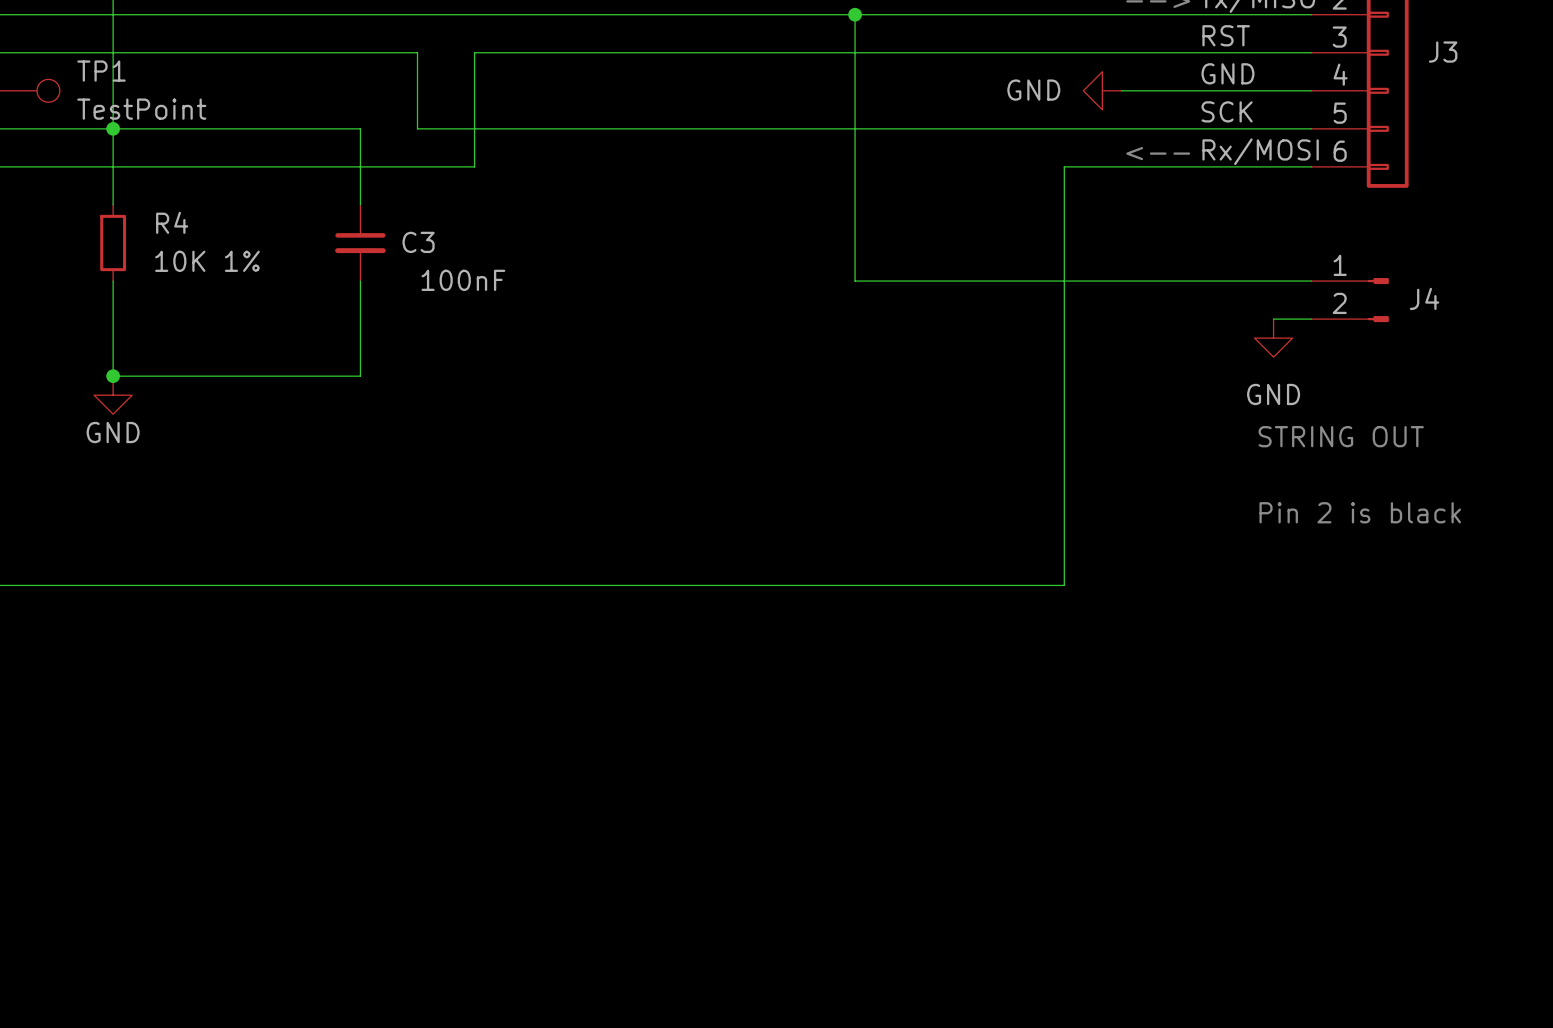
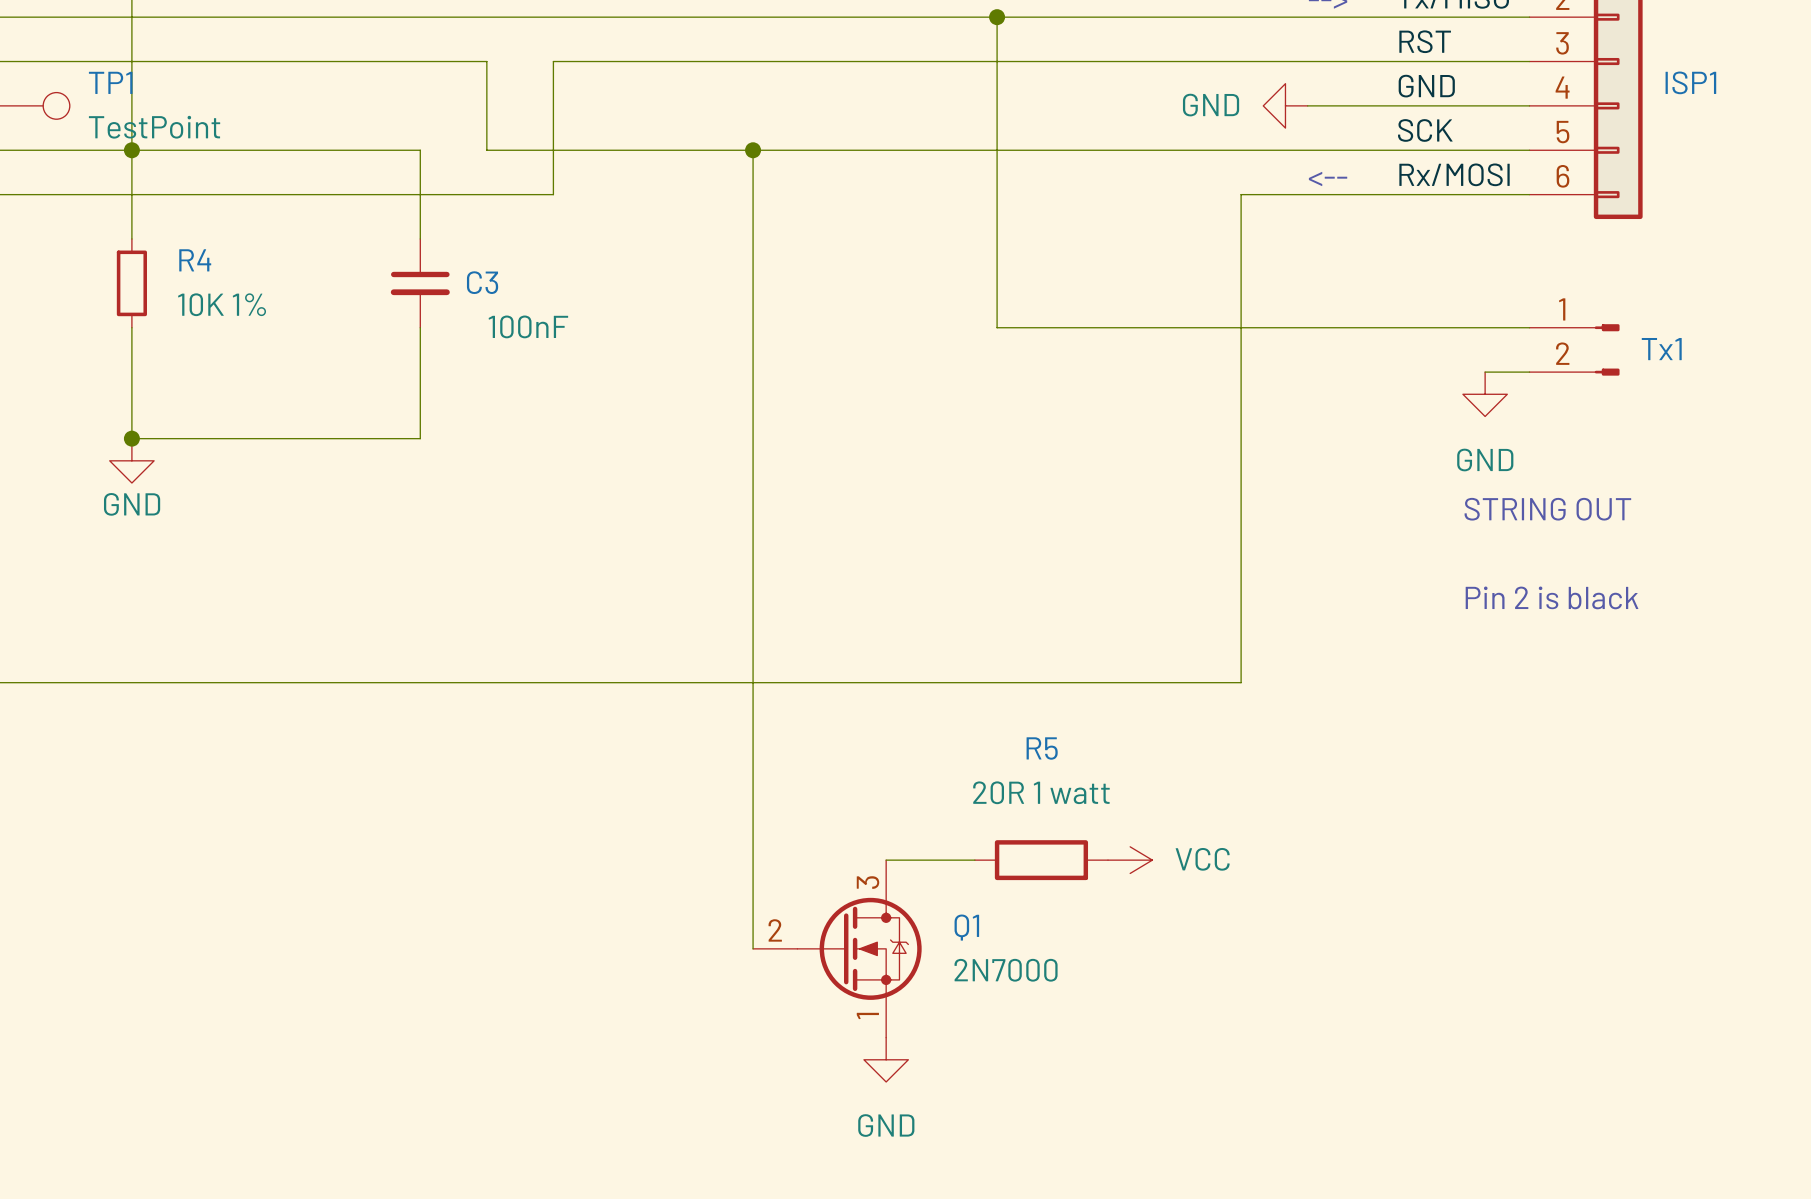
J3 name: J3 (1443, 52) -> ISP1 (1690, 82)
wire: none -> (753, 150) (753, 948)
junction: none -> (753, 150)
J4 name: J4 (1424, 298) -> Tx1 (1661, 349)
wire: none -> (886, 860) (974, 860)
R5: none -> 20R 1 watt (1041, 860)
power symbol: none -> VCC (1130, 860)
Q1: none -> 2N7000 (837, 948)
power symbol: none -> GND (886, 1059)

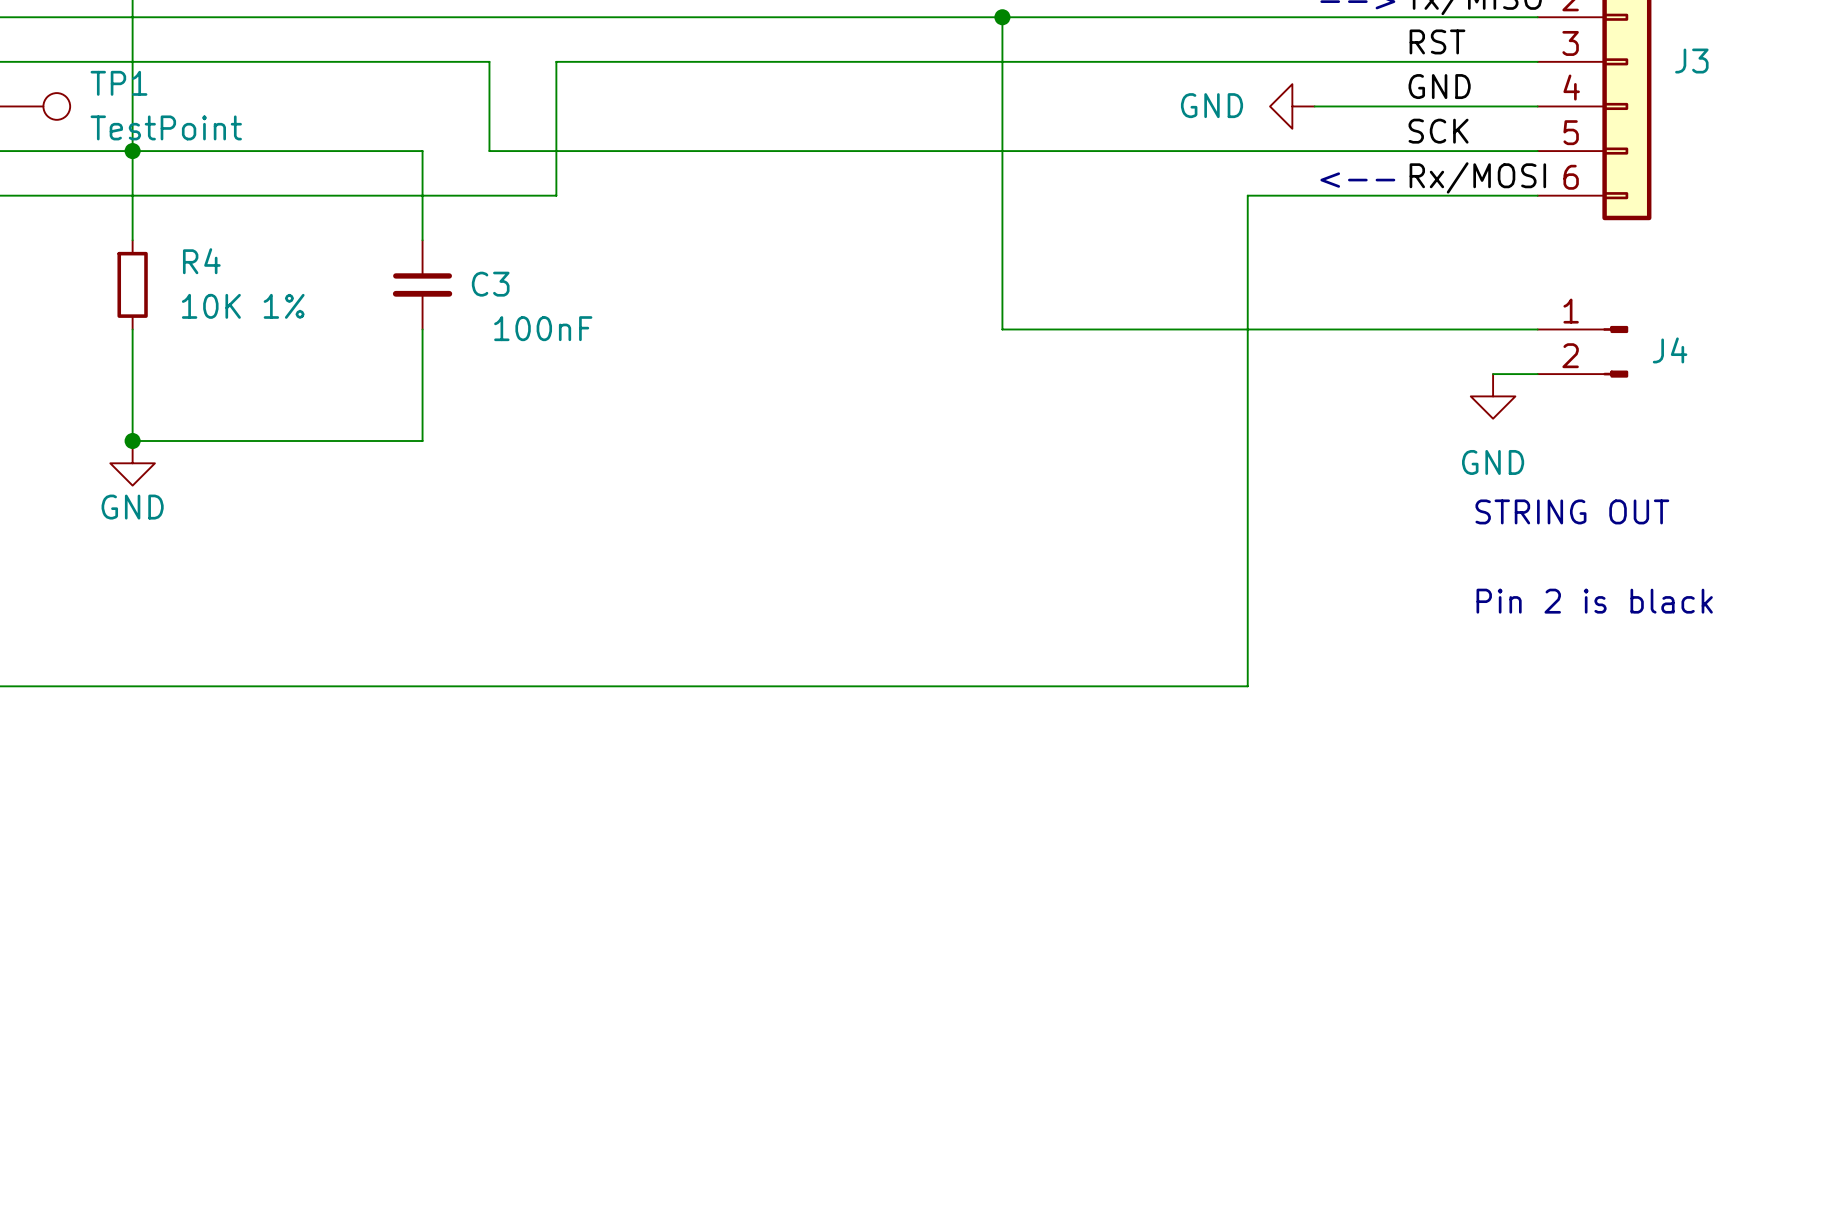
ISP1 name: ISP1 (1690, 82) -> J3 (1691, 61)
wire: (753, 150) (753, 948) -> none
junction: (753, 150) -> none
Tx1 name: Tx1 (1661, 349) -> J4 (1670, 350)
wire: (886, 860) (974, 860) -> none
R5: 20R 1 watt (1041, 860) -> none
power symbol: VCC (1130, 860) -> none
Q1: 2N7000 (837, 948) -> none
power symbol: GND (886, 1059) -> none

